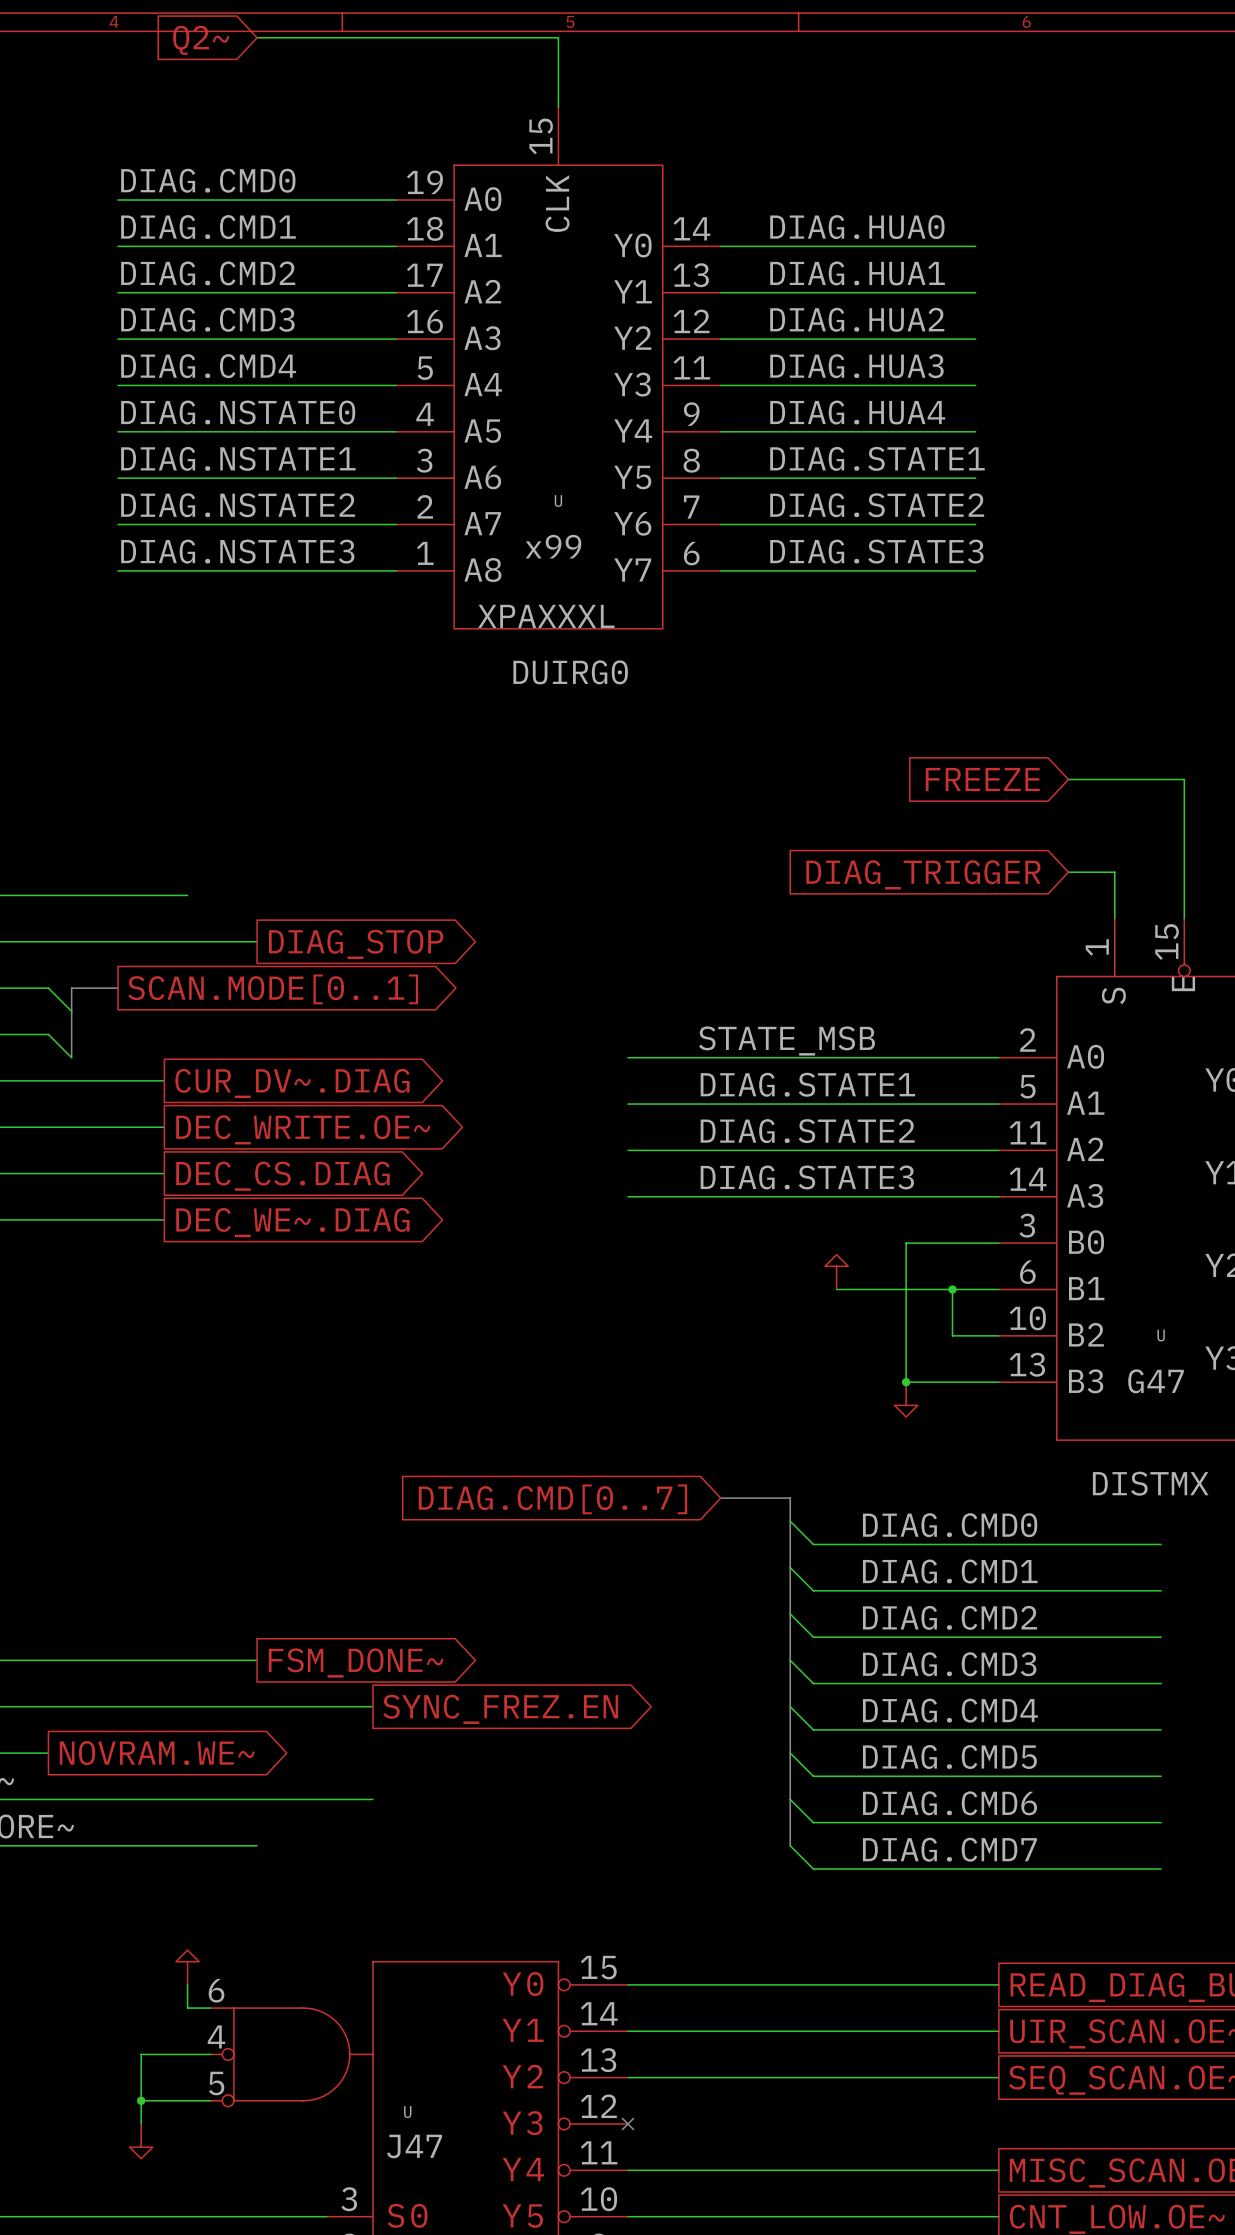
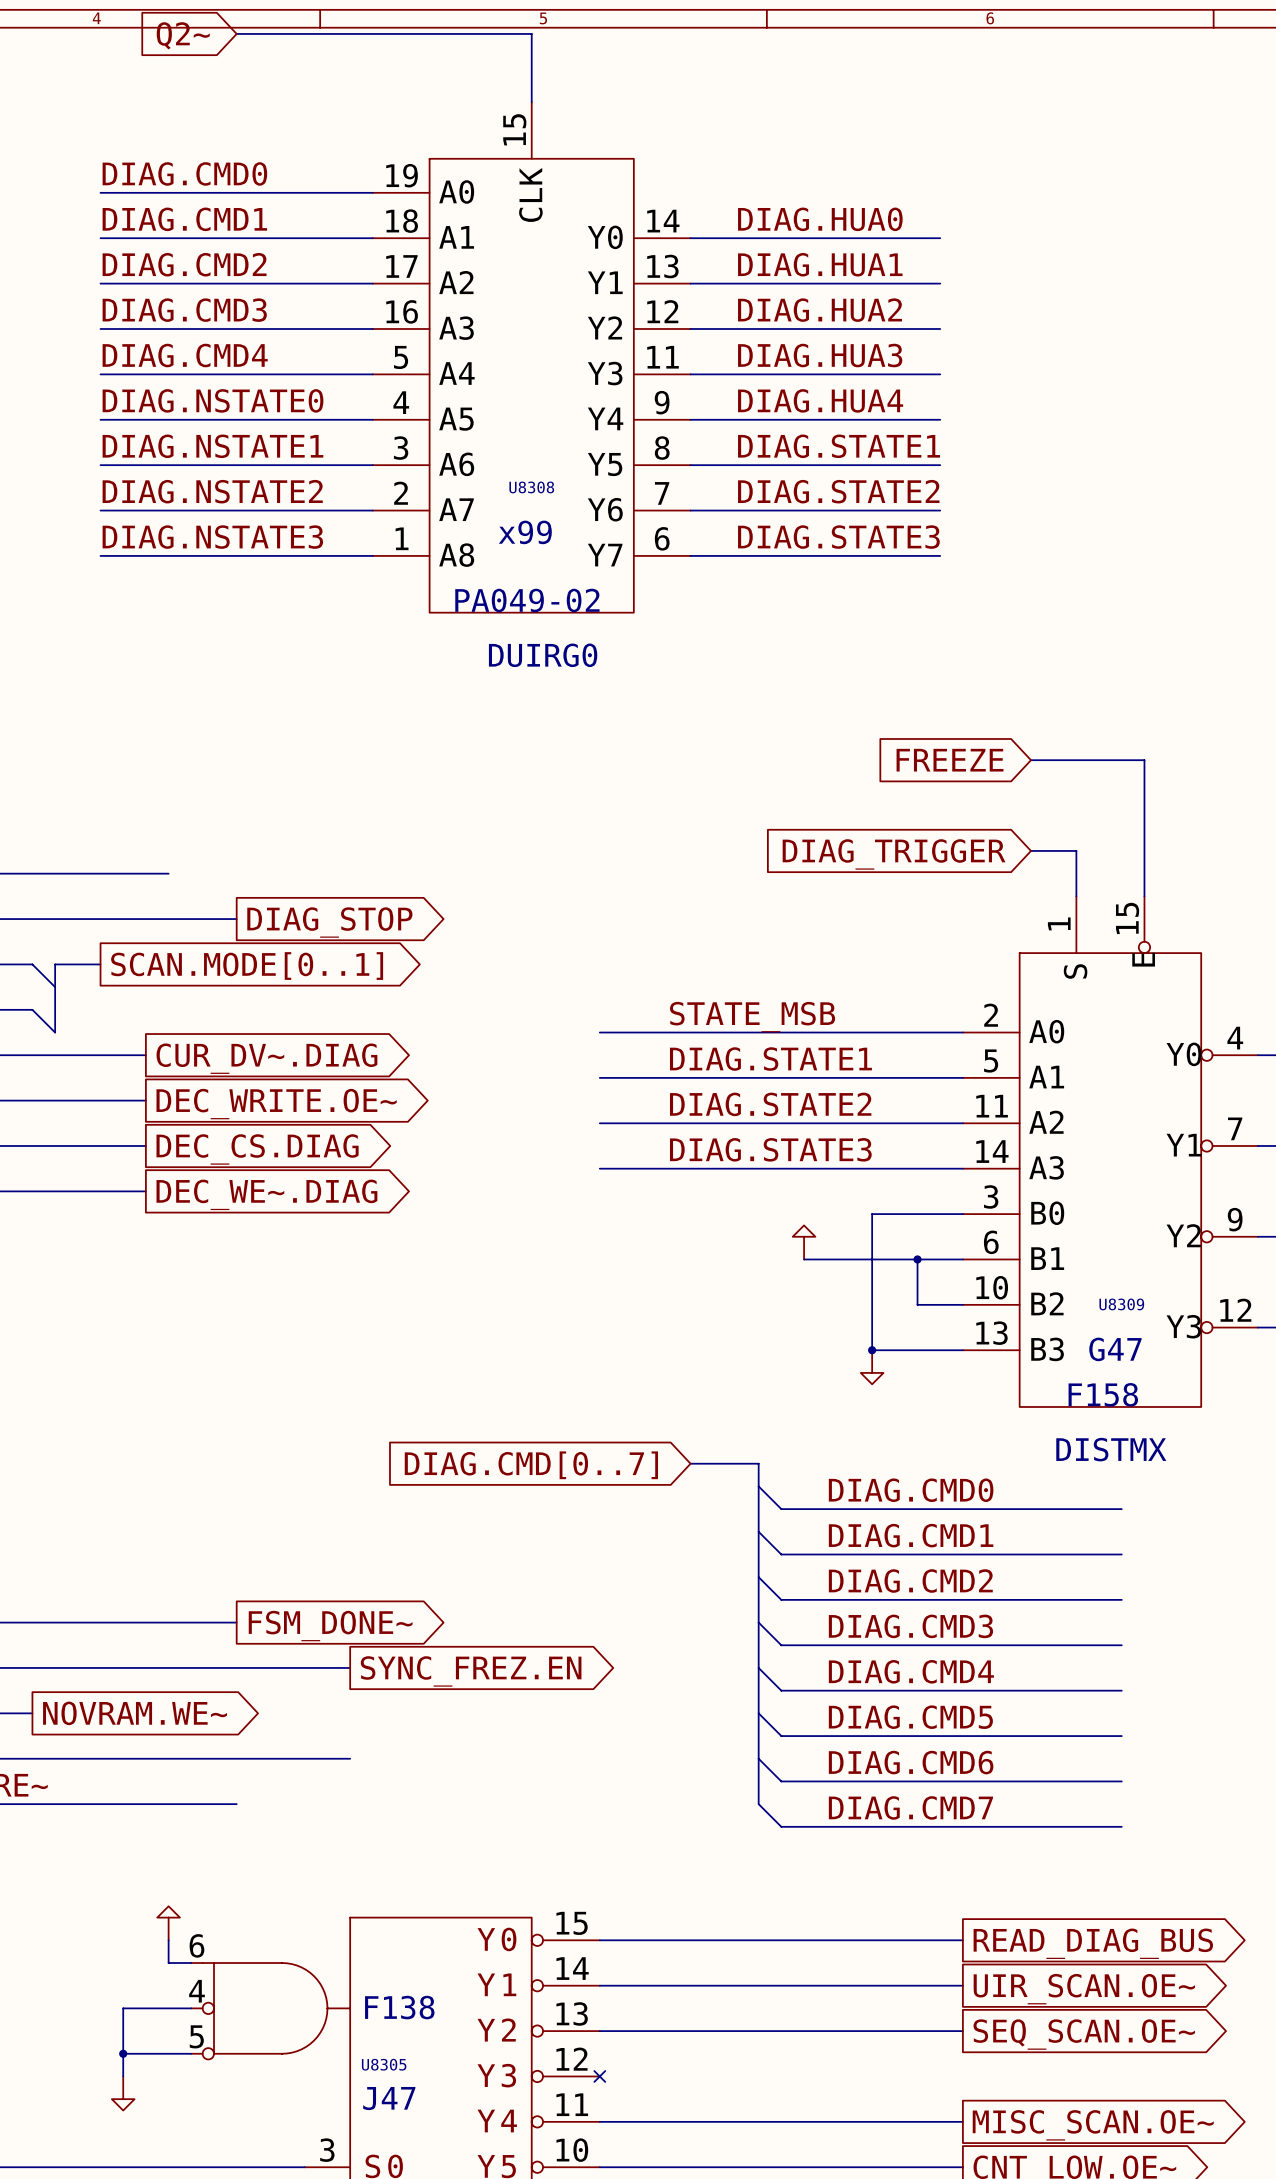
U name: U (558, 501) -> U8308 (531, 487)
U value: XPAXXXL (546, 616) -> PA049-02 (527, 600)
U name: U (1161, 1335) -> U8309 (1121, 1304)
U value: none -> F158 (1103, 1394)
U value: none -> F138 (399, 2007)
U name: U (407, 2112) -> U8305 (384, 2064)

